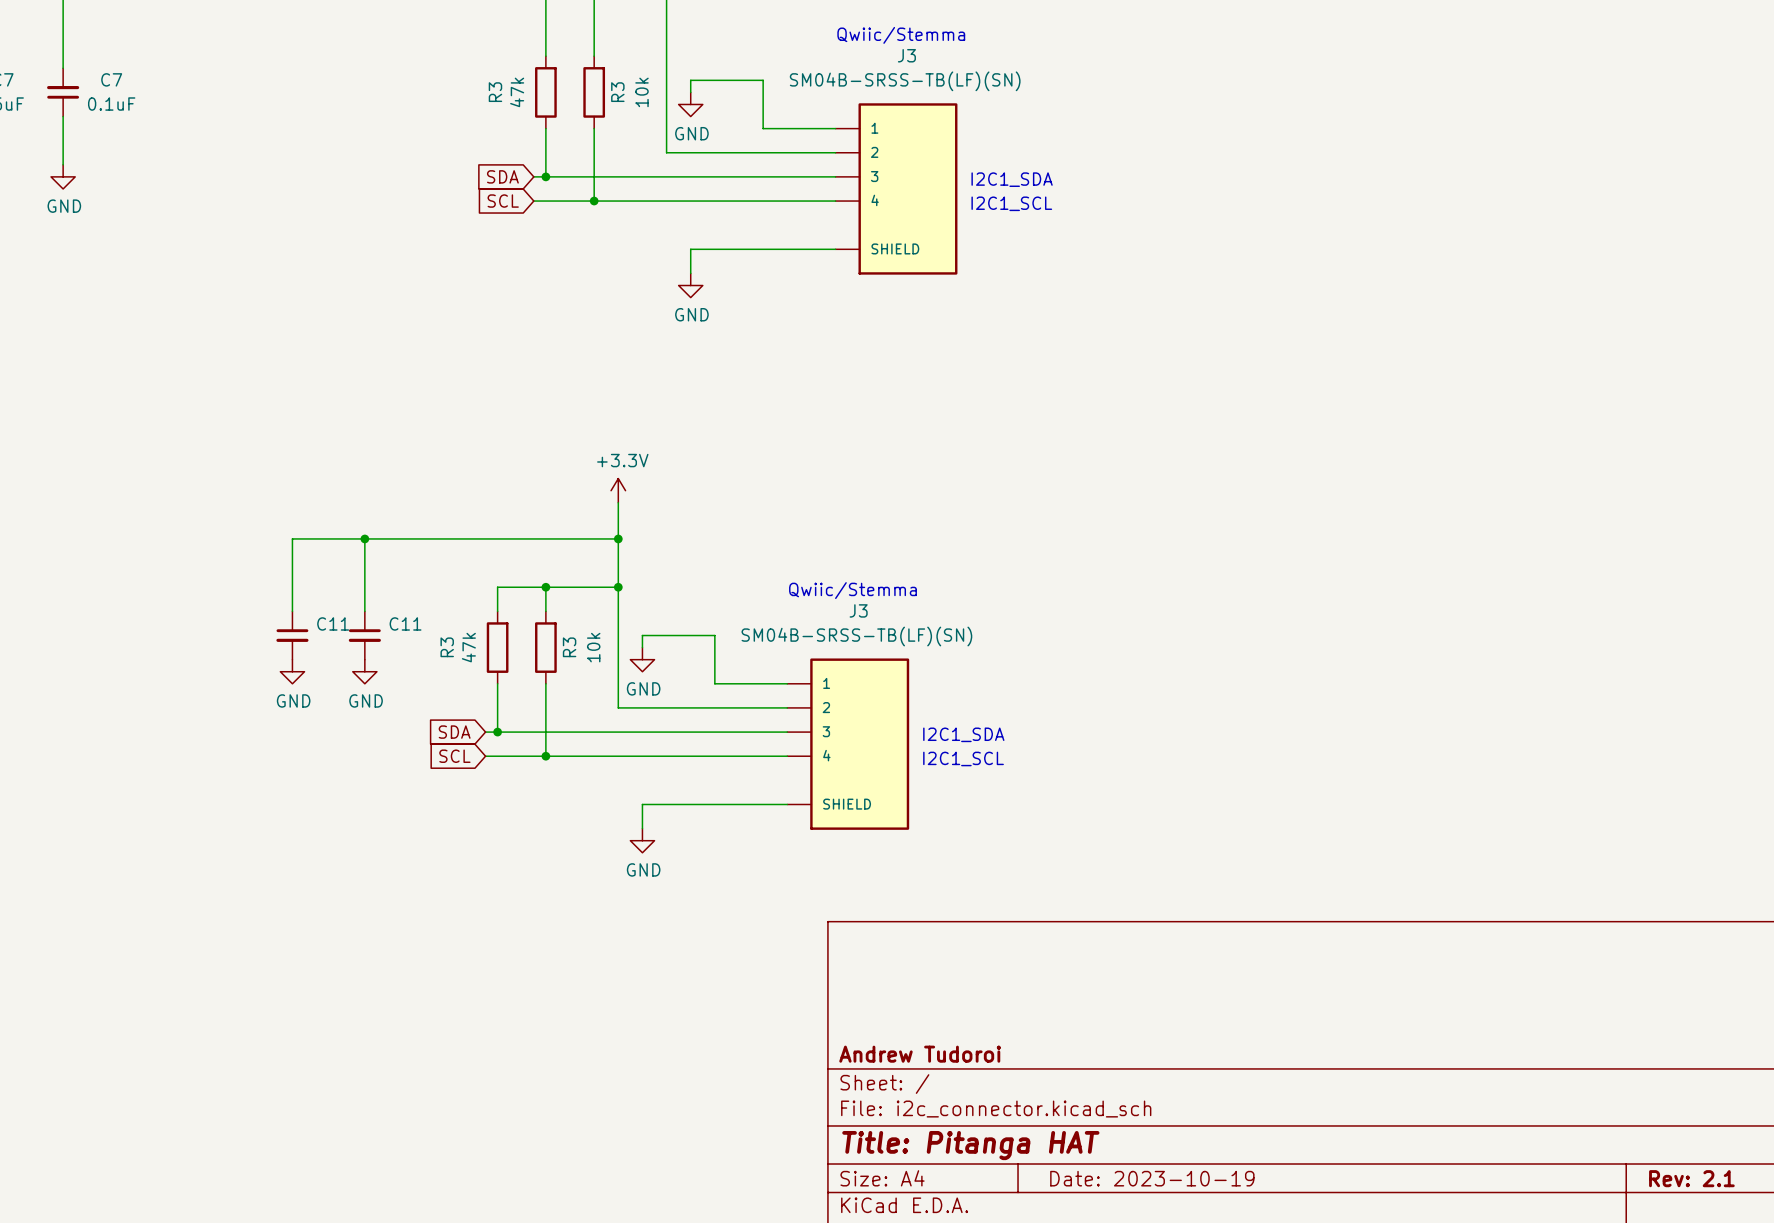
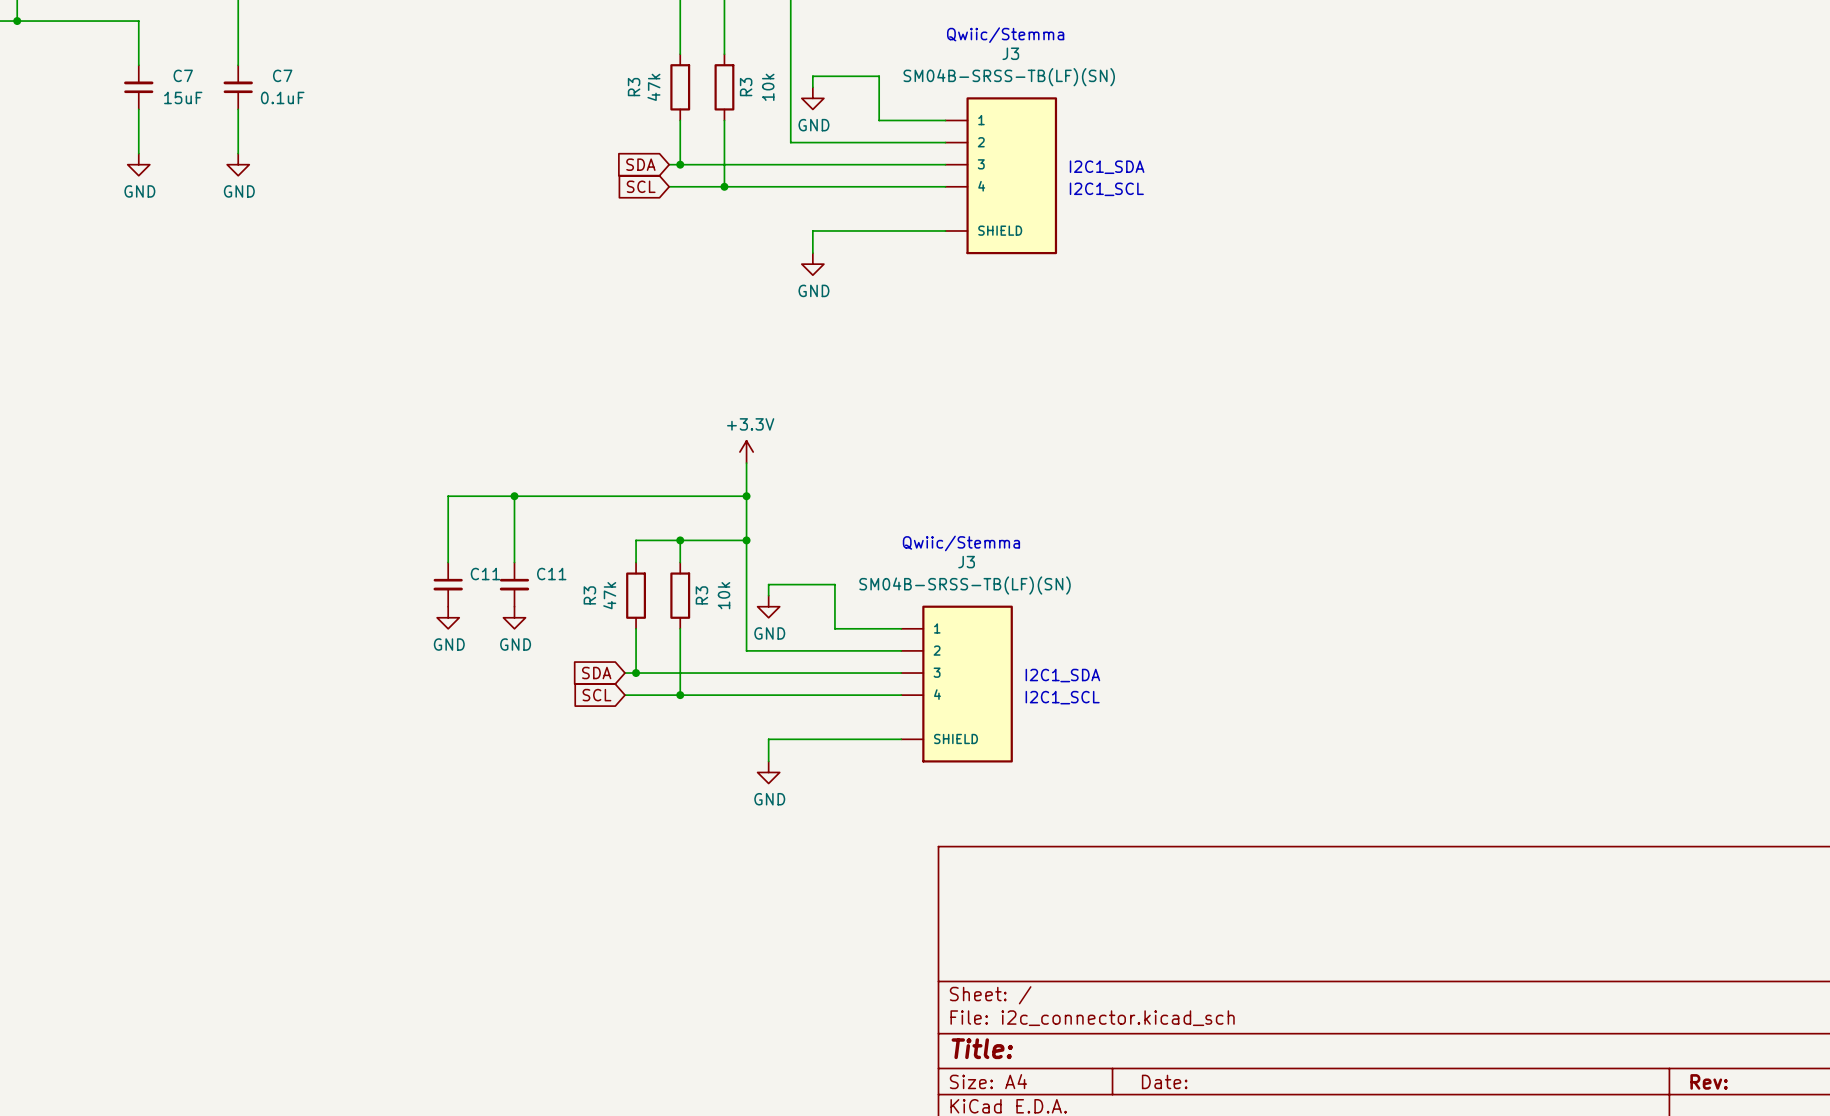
title block: Andrew Tudoroi (920, 1054) -> none
title block: Title: Pitanga HAT (970, 1145) -> Title: (982, 1048)
title block: Date: 2023-10-19 (1152, 1178) -> Date: (1164, 1081)
title block: Rev: 2.1 (1691, 1178) -> Rev: (1709, 1081)

